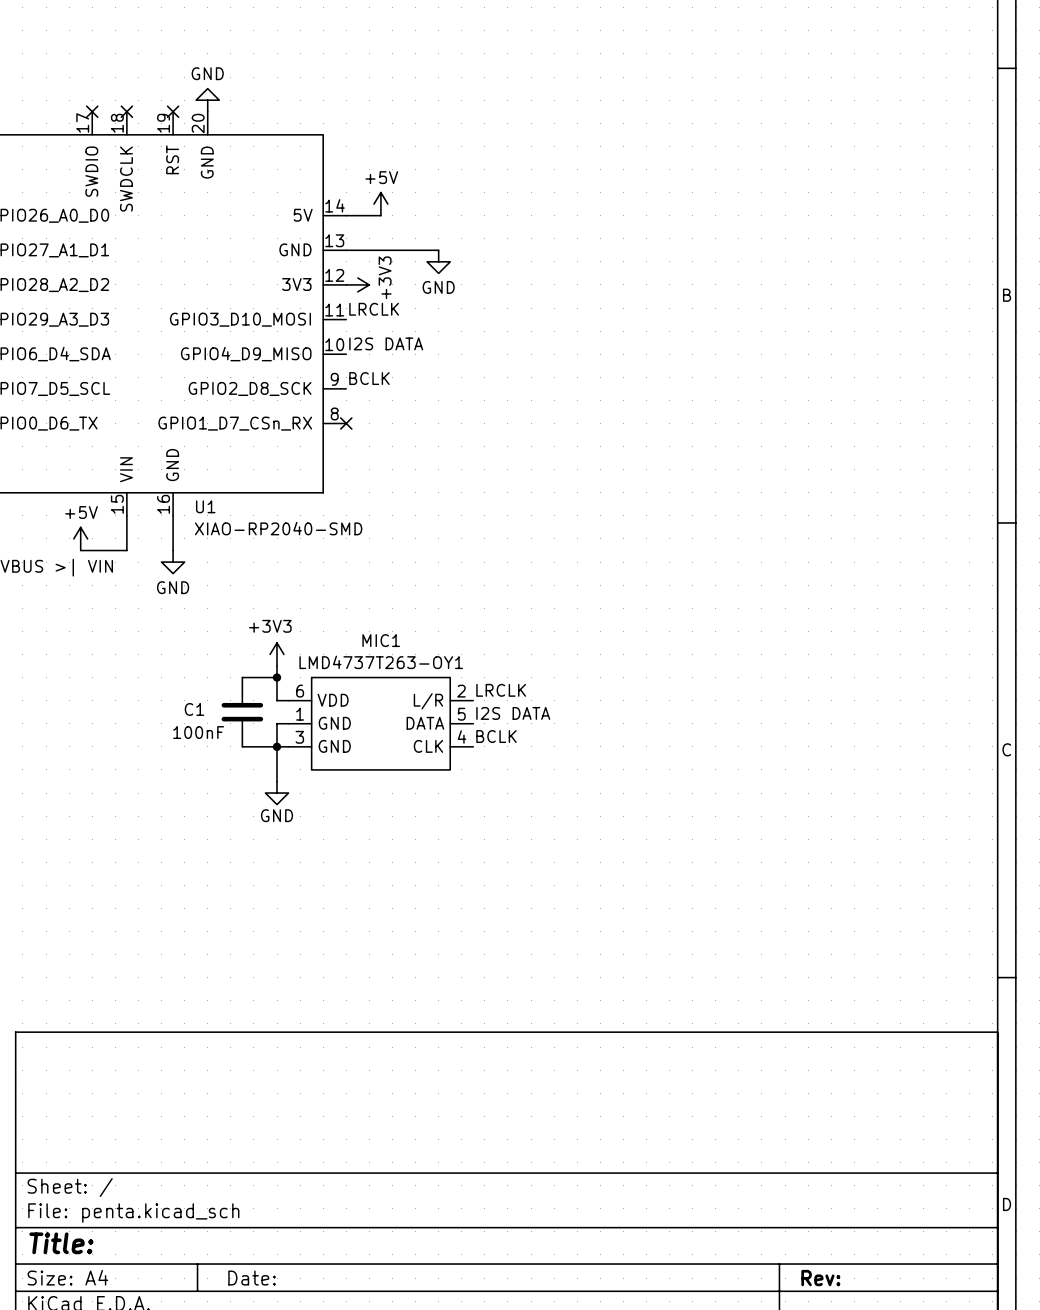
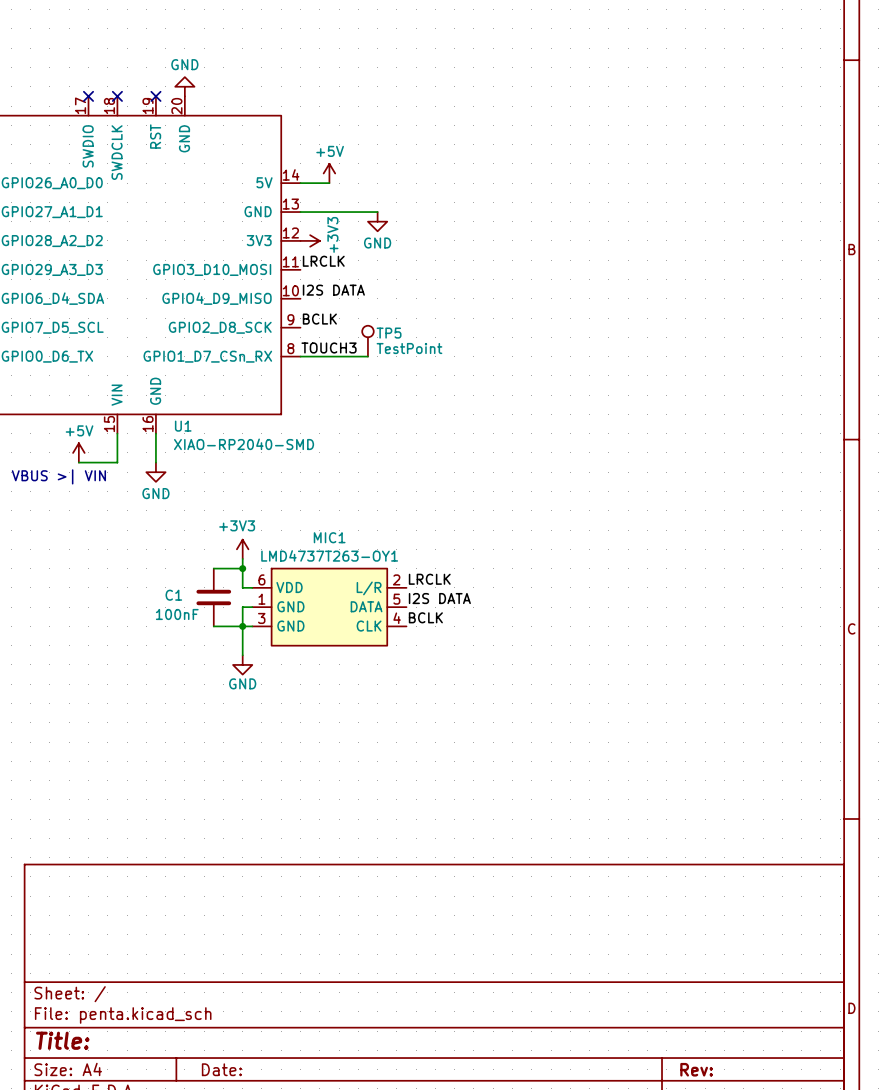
TP5: none -> TestPoint (367, 341)
label: none -> TOUCH3 (329, 347)
wire: none -> (300, 356) (367, 356)
no-connect mark: (346, 423) -> none

